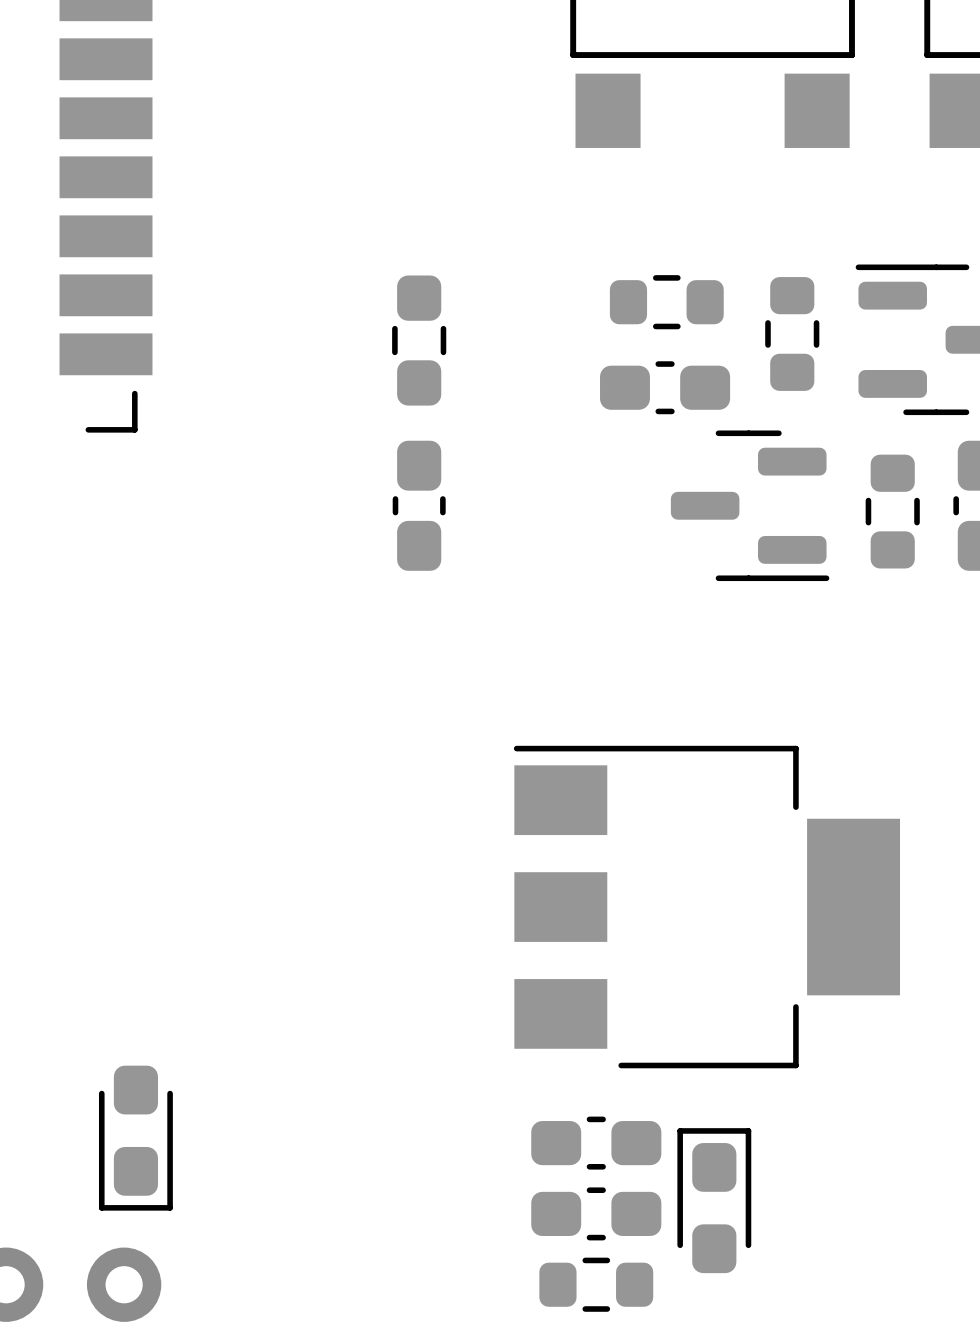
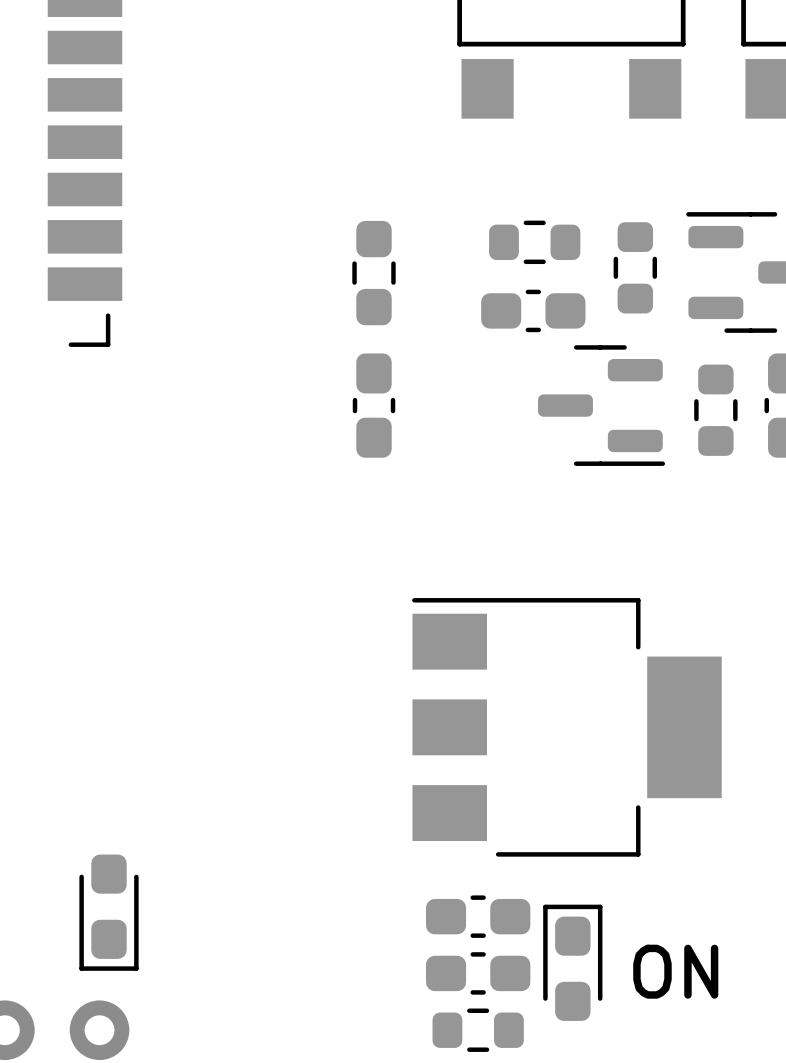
part position: (419, 340) -> (374, 273)
part position: (419, 505) -> (374, 405)
text: none -> ON (675, 971)

